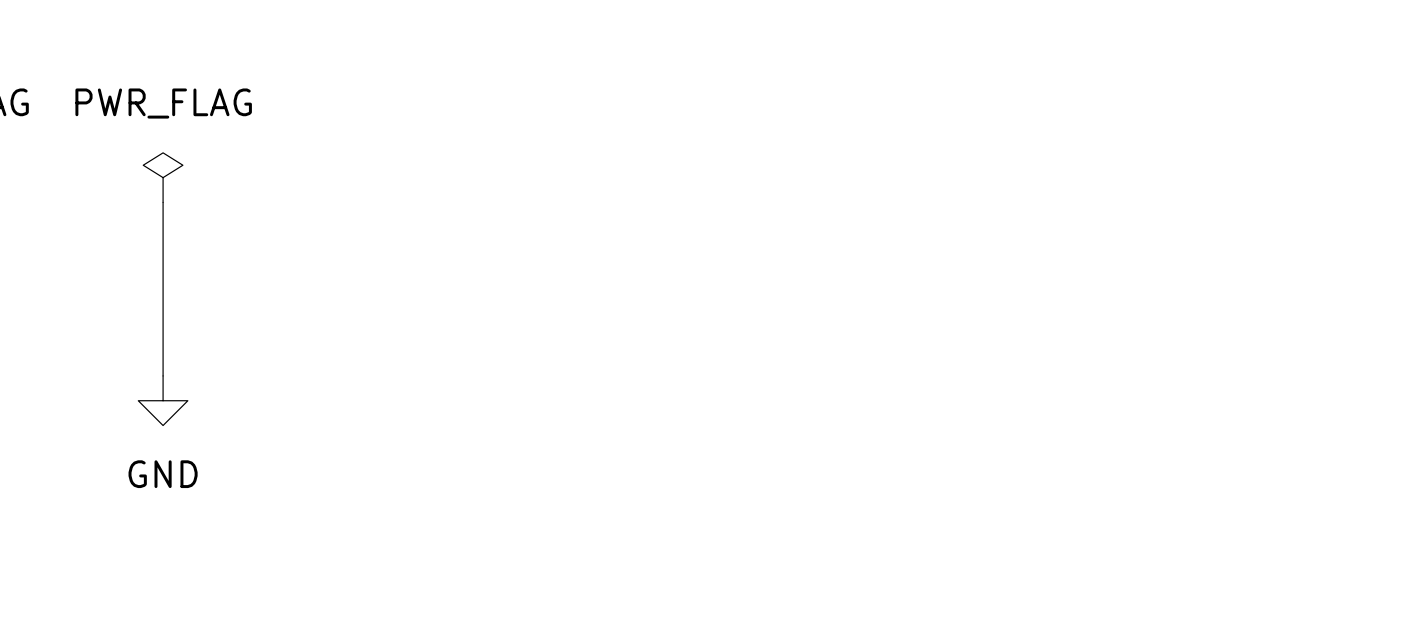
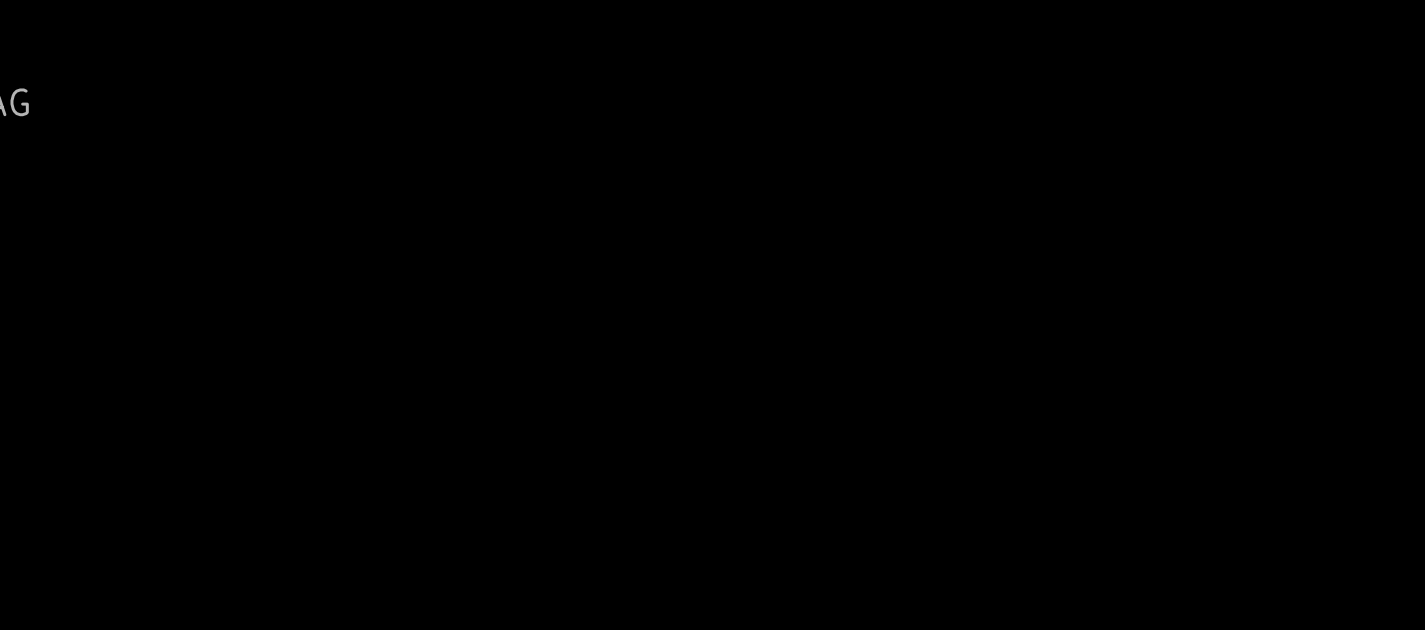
power symbol: PWR_FLAG (163, 177) -> none
wire: (163, 202) (163, 375) -> none
power symbol: GND (163, 400) -> none

